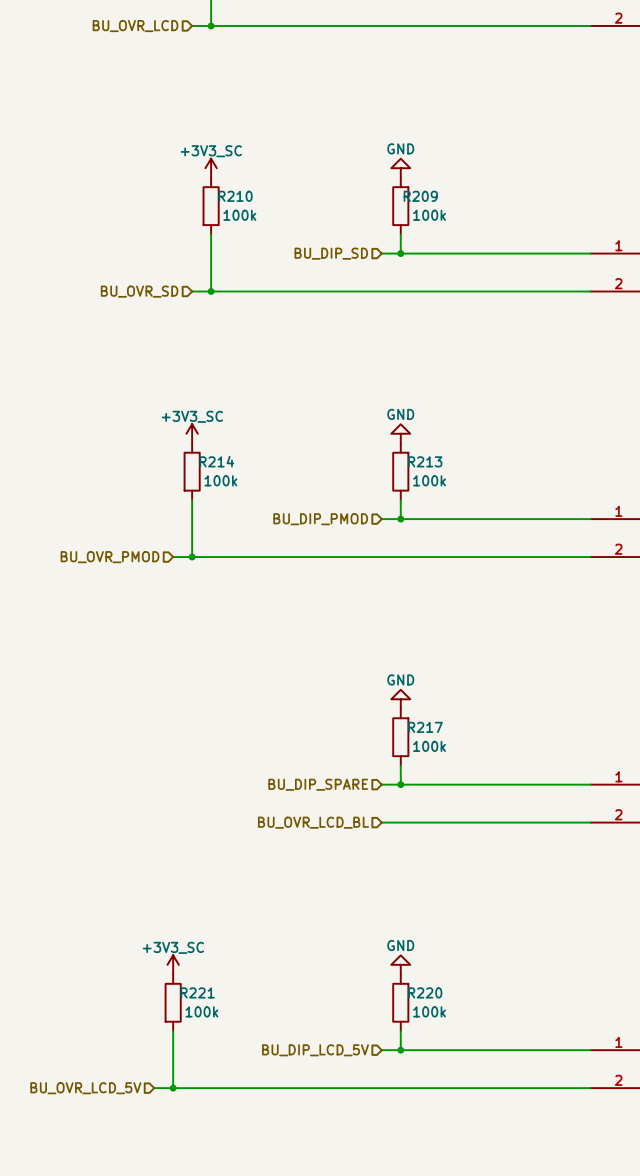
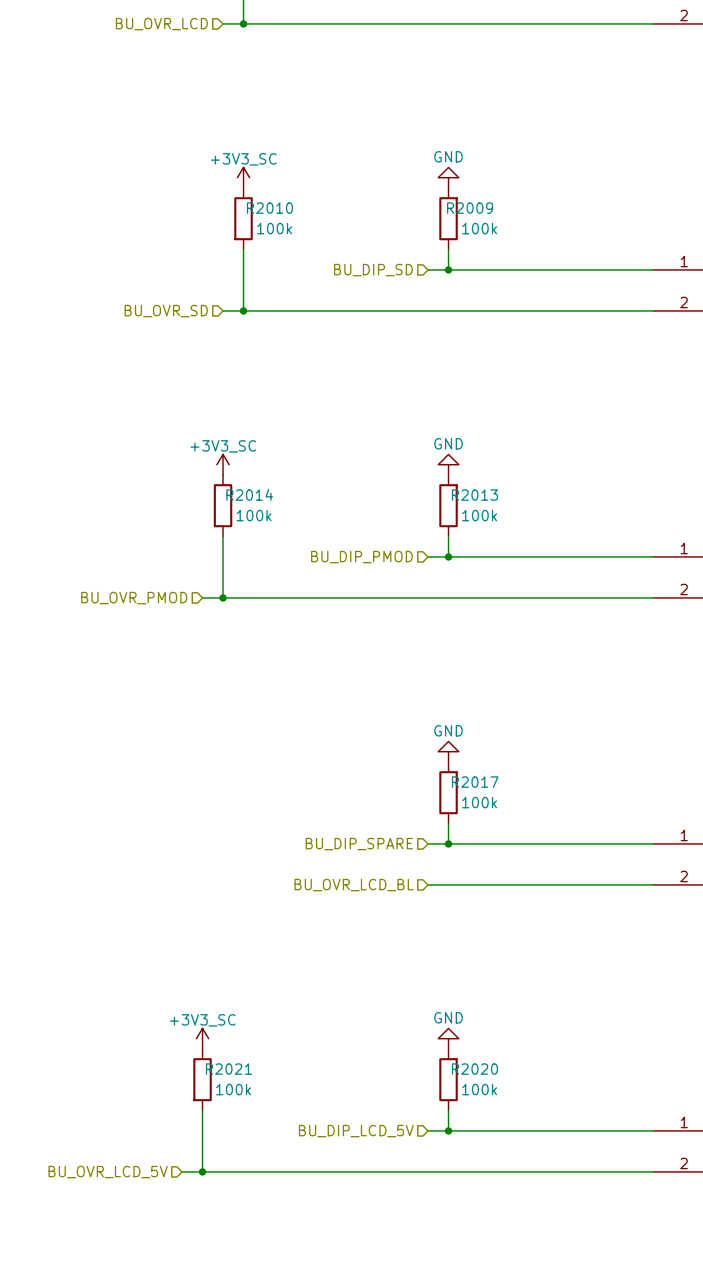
R210 name: R210 (235, 196) -> R2010 (269, 208)
R209 name: R209 (420, 196) -> R2009 (470, 208)
R214 name: R214 (216, 461) -> R2014 (249, 494)
R213 name: R213 (425, 461) -> R2013 (474, 495)
R217 name: R217 (425, 727) -> R2017 (475, 782)
R221 name: R221 (197, 992) -> R2021 (228, 1069)
R220 name: R220 (425, 992) -> R2020 (474, 1069)

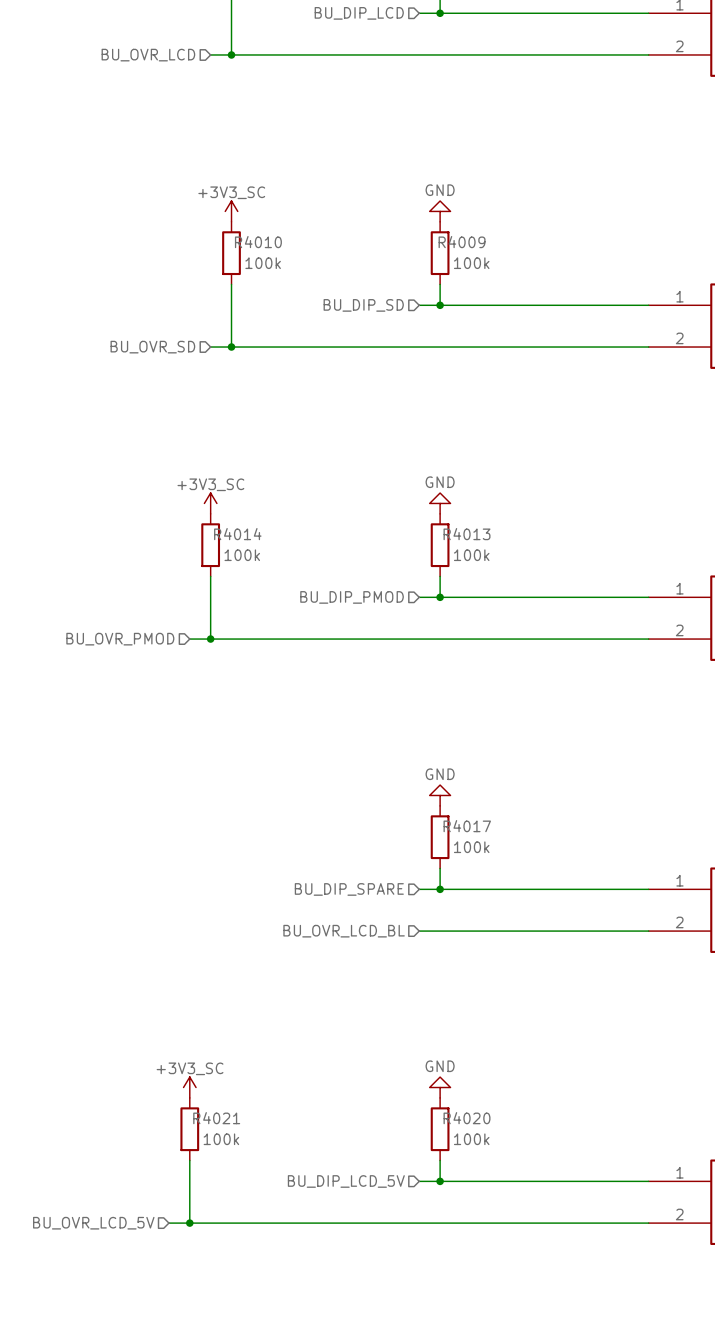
R2010 name: R2010 (269, 208) -> R4010 (258, 242)
R2009 name: R2009 (470, 208) -> R4009 (462, 242)
R2014 name: R2014 (249, 494) -> R4014 (237, 534)
R2013 name: R2013 (474, 495) -> R4013 (467, 534)
R2017 name: R2017 (475, 782) -> R4017 (467, 826)
R2021 name: R2021 (228, 1069) -> R4021 (216, 1118)
R2020 name: R2020 (474, 1069) -> R4020 (467, 1118)

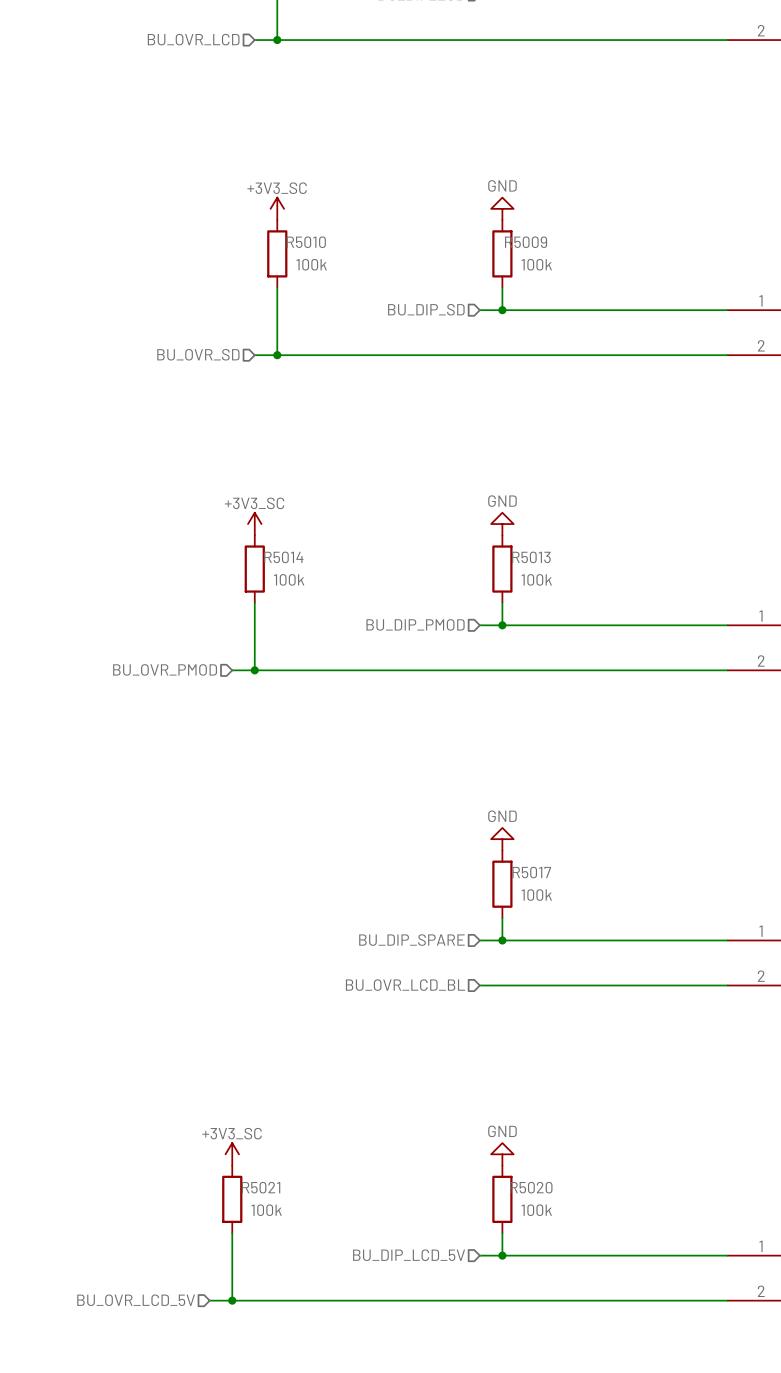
R4010 name: R4010 (258, 242) -> R5010 (306, 242)
R4009 name: R4009 (462, 242) -> R5009 (526, 242)
R4014 name: R4014 (237, 534) -> R5014 (283, 557)
R4013 name: R4013 (467, 534) -> R5013 (531, 557)
R4017 name: R4017 (467, 826) -> R5017 (531, 872)
R4021 name: R4021 (216, 1118) -> R5021 (261, 1187)
R4020 name: R4020 (467, 1118) -> R5020 (531, 1187)

